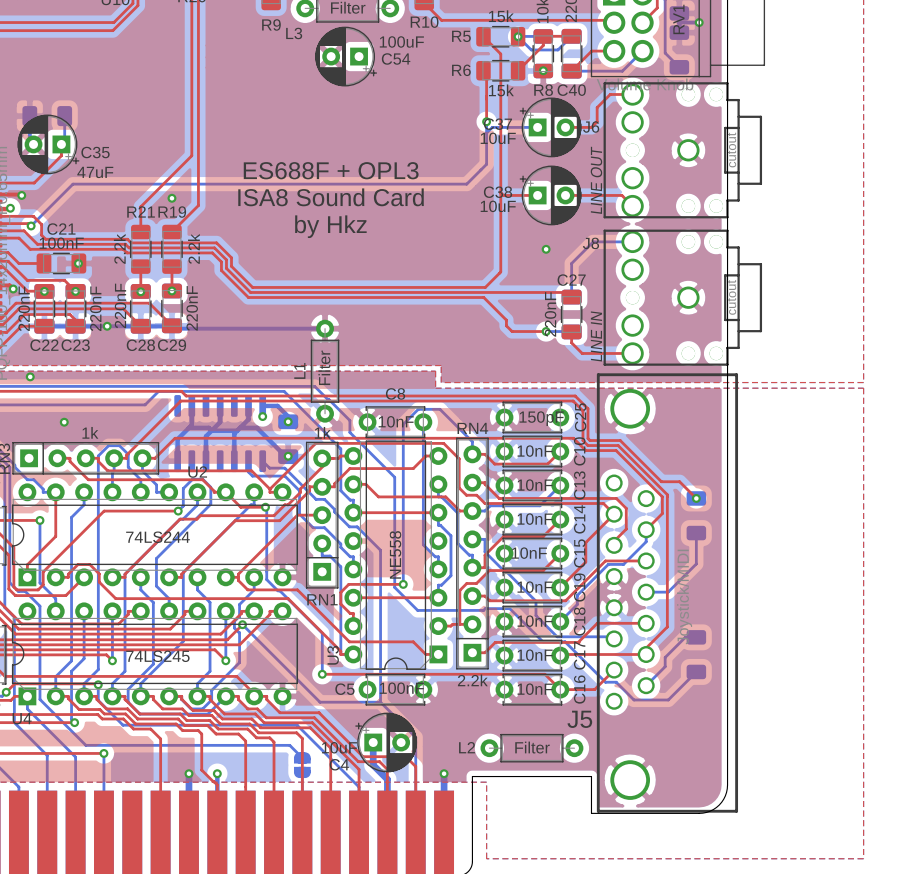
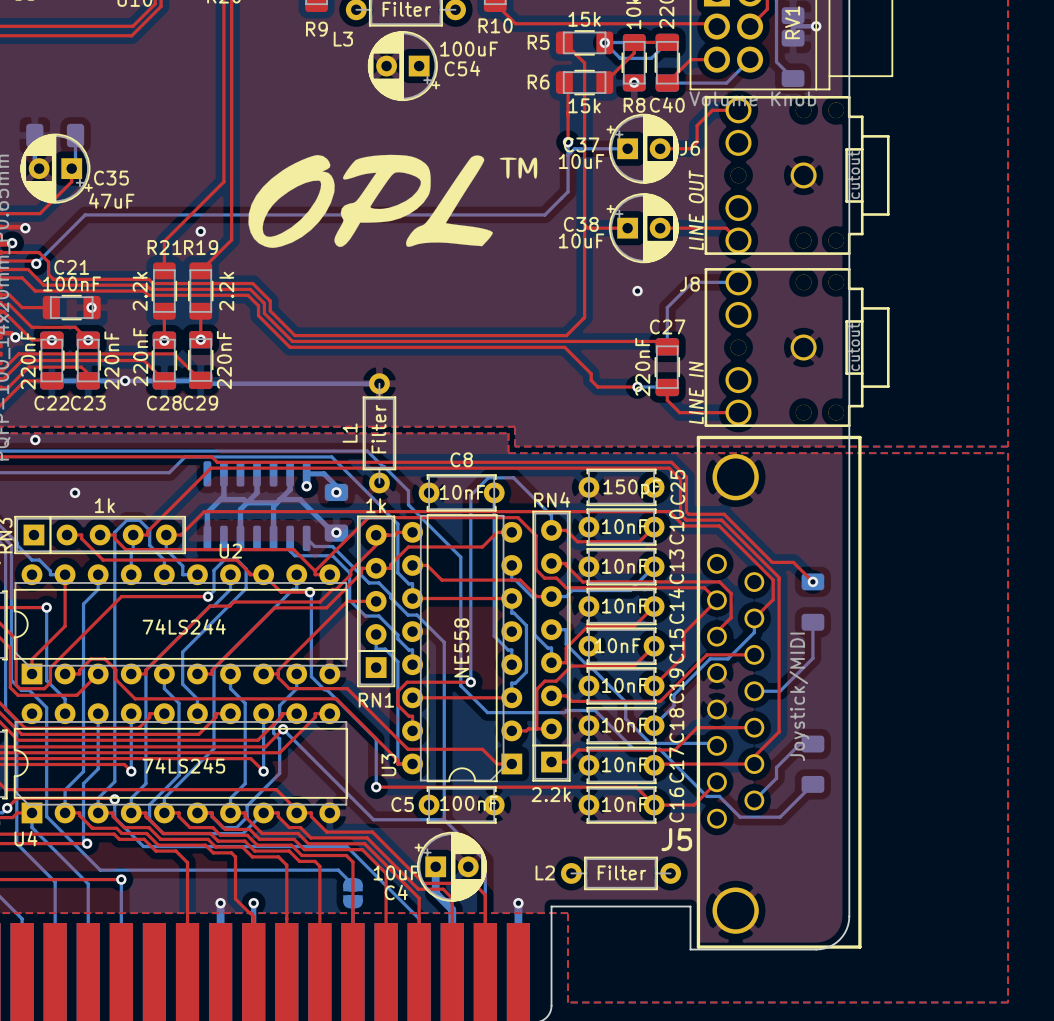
drawing: none -> [248, 154, 538, 248]
text: ES688F + OPL3 (331, 170) -> none
text: ISA8 Sound Card (331, 197) -> none
text: by Hkz (330, 226) -> none

